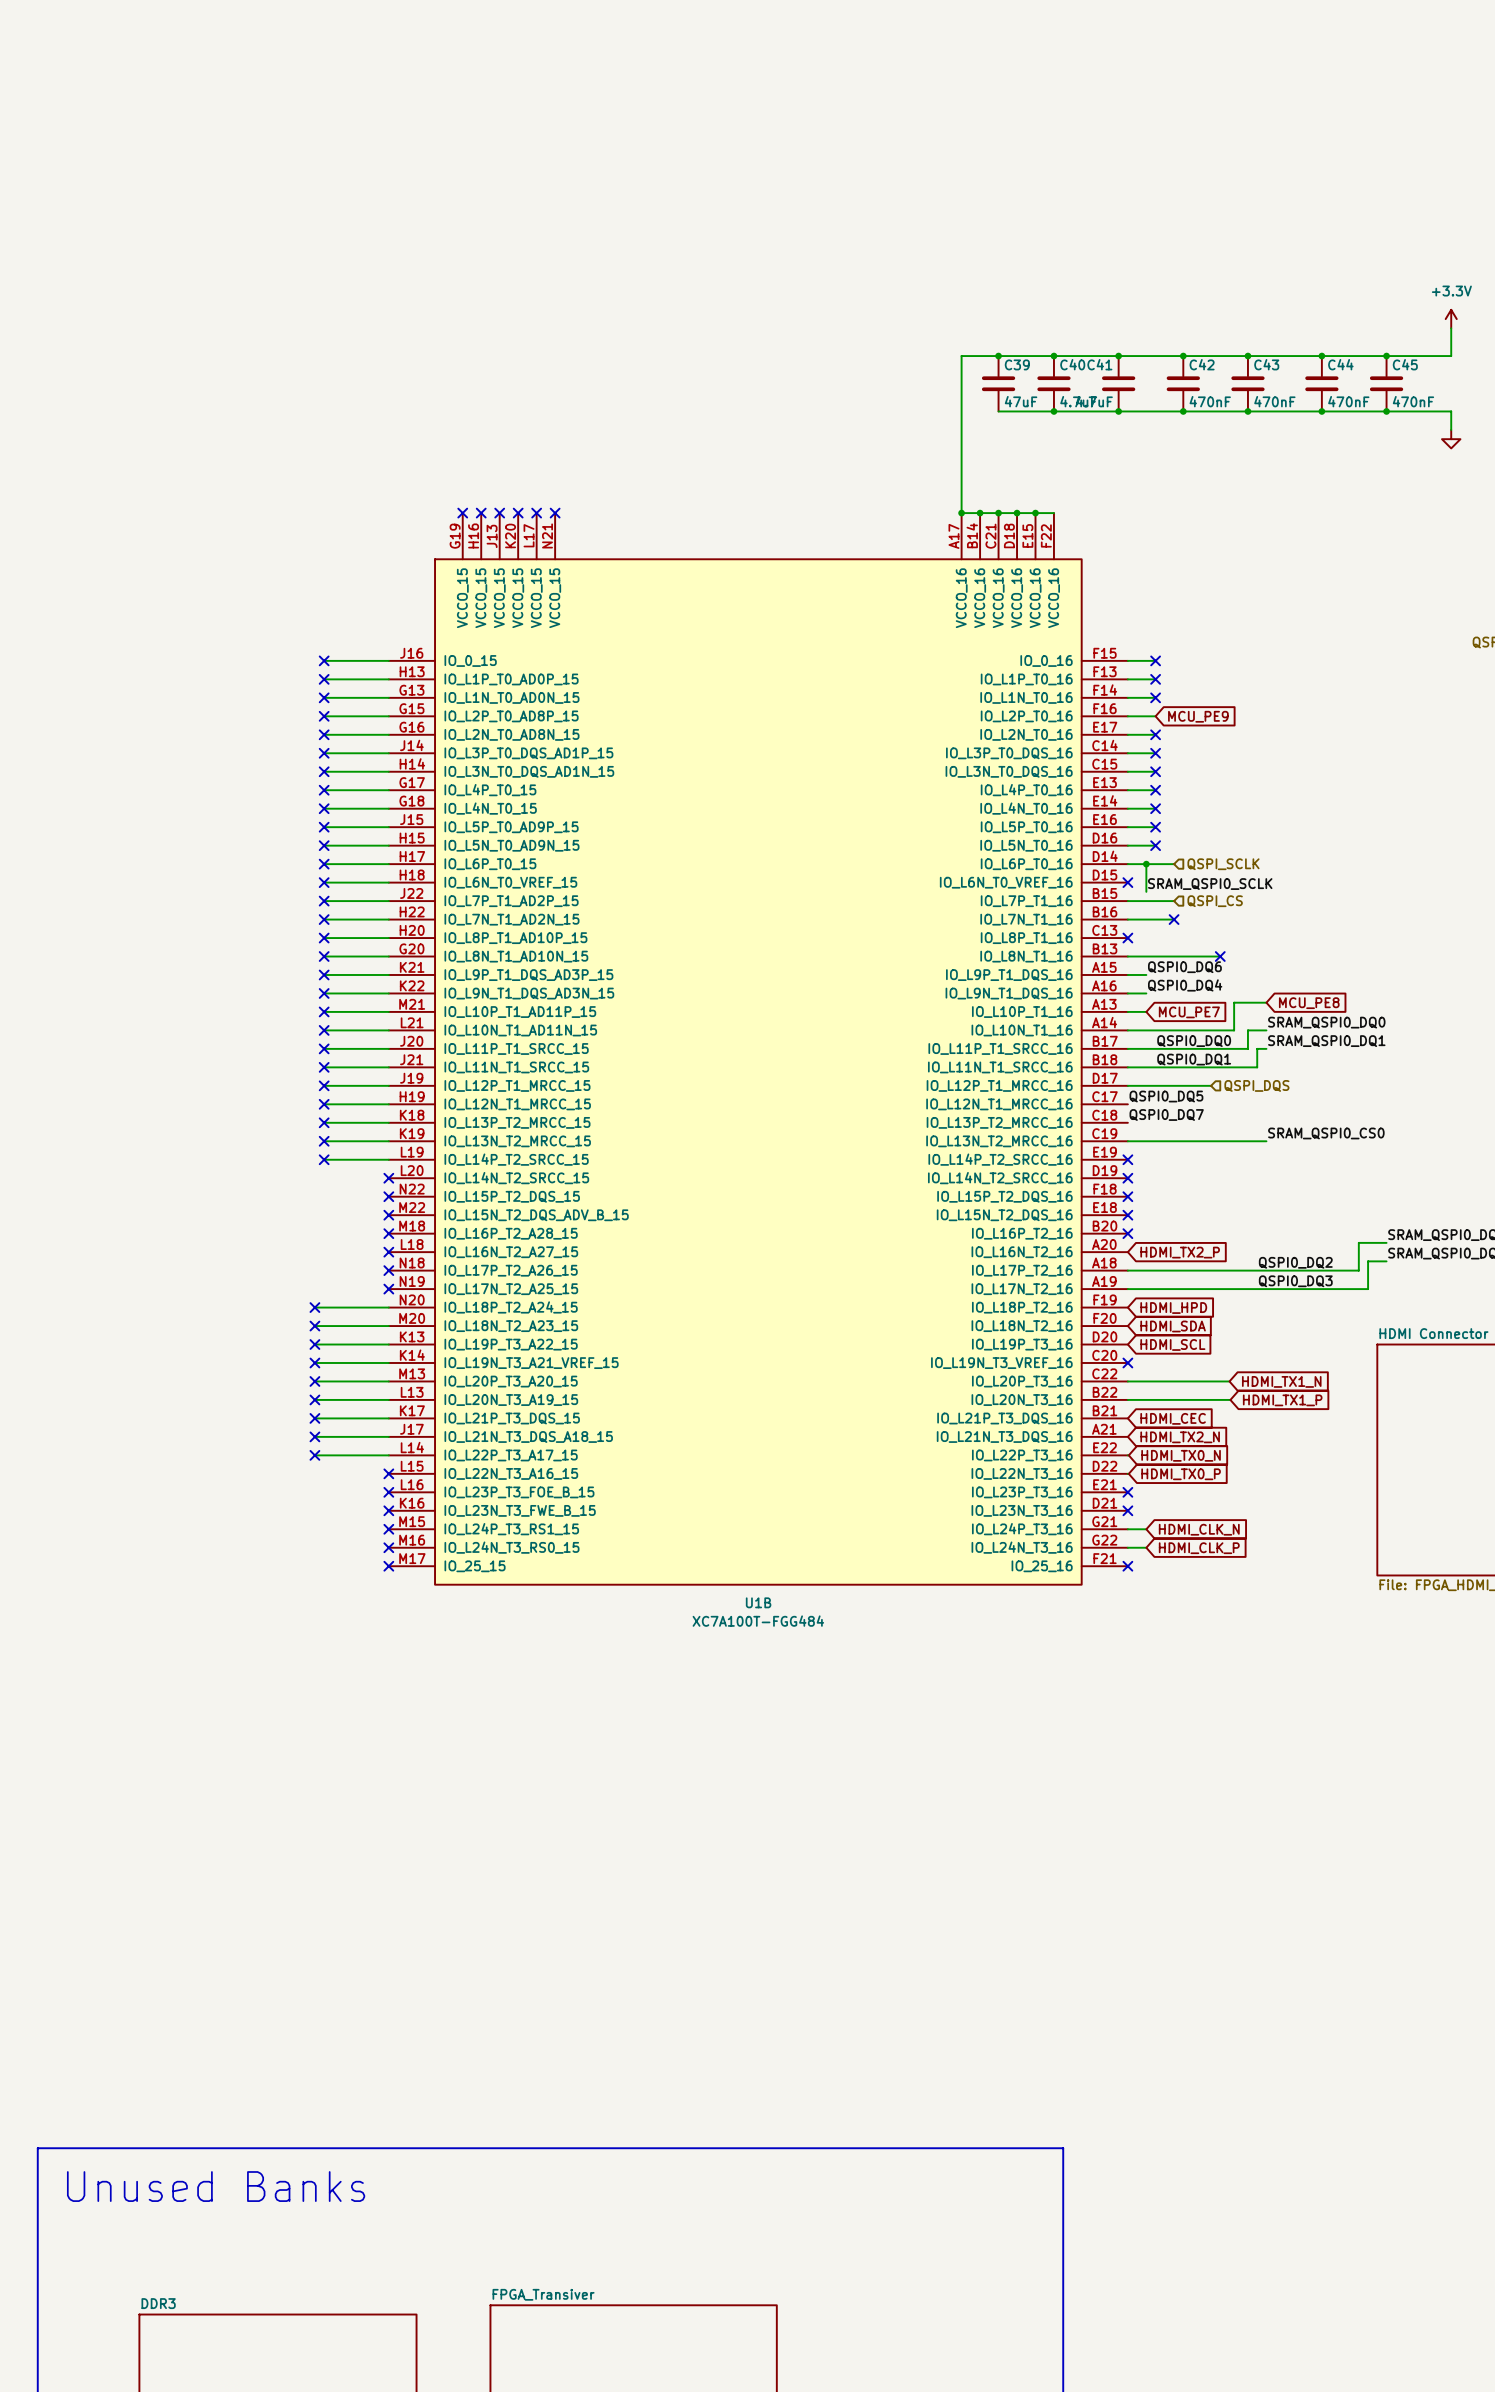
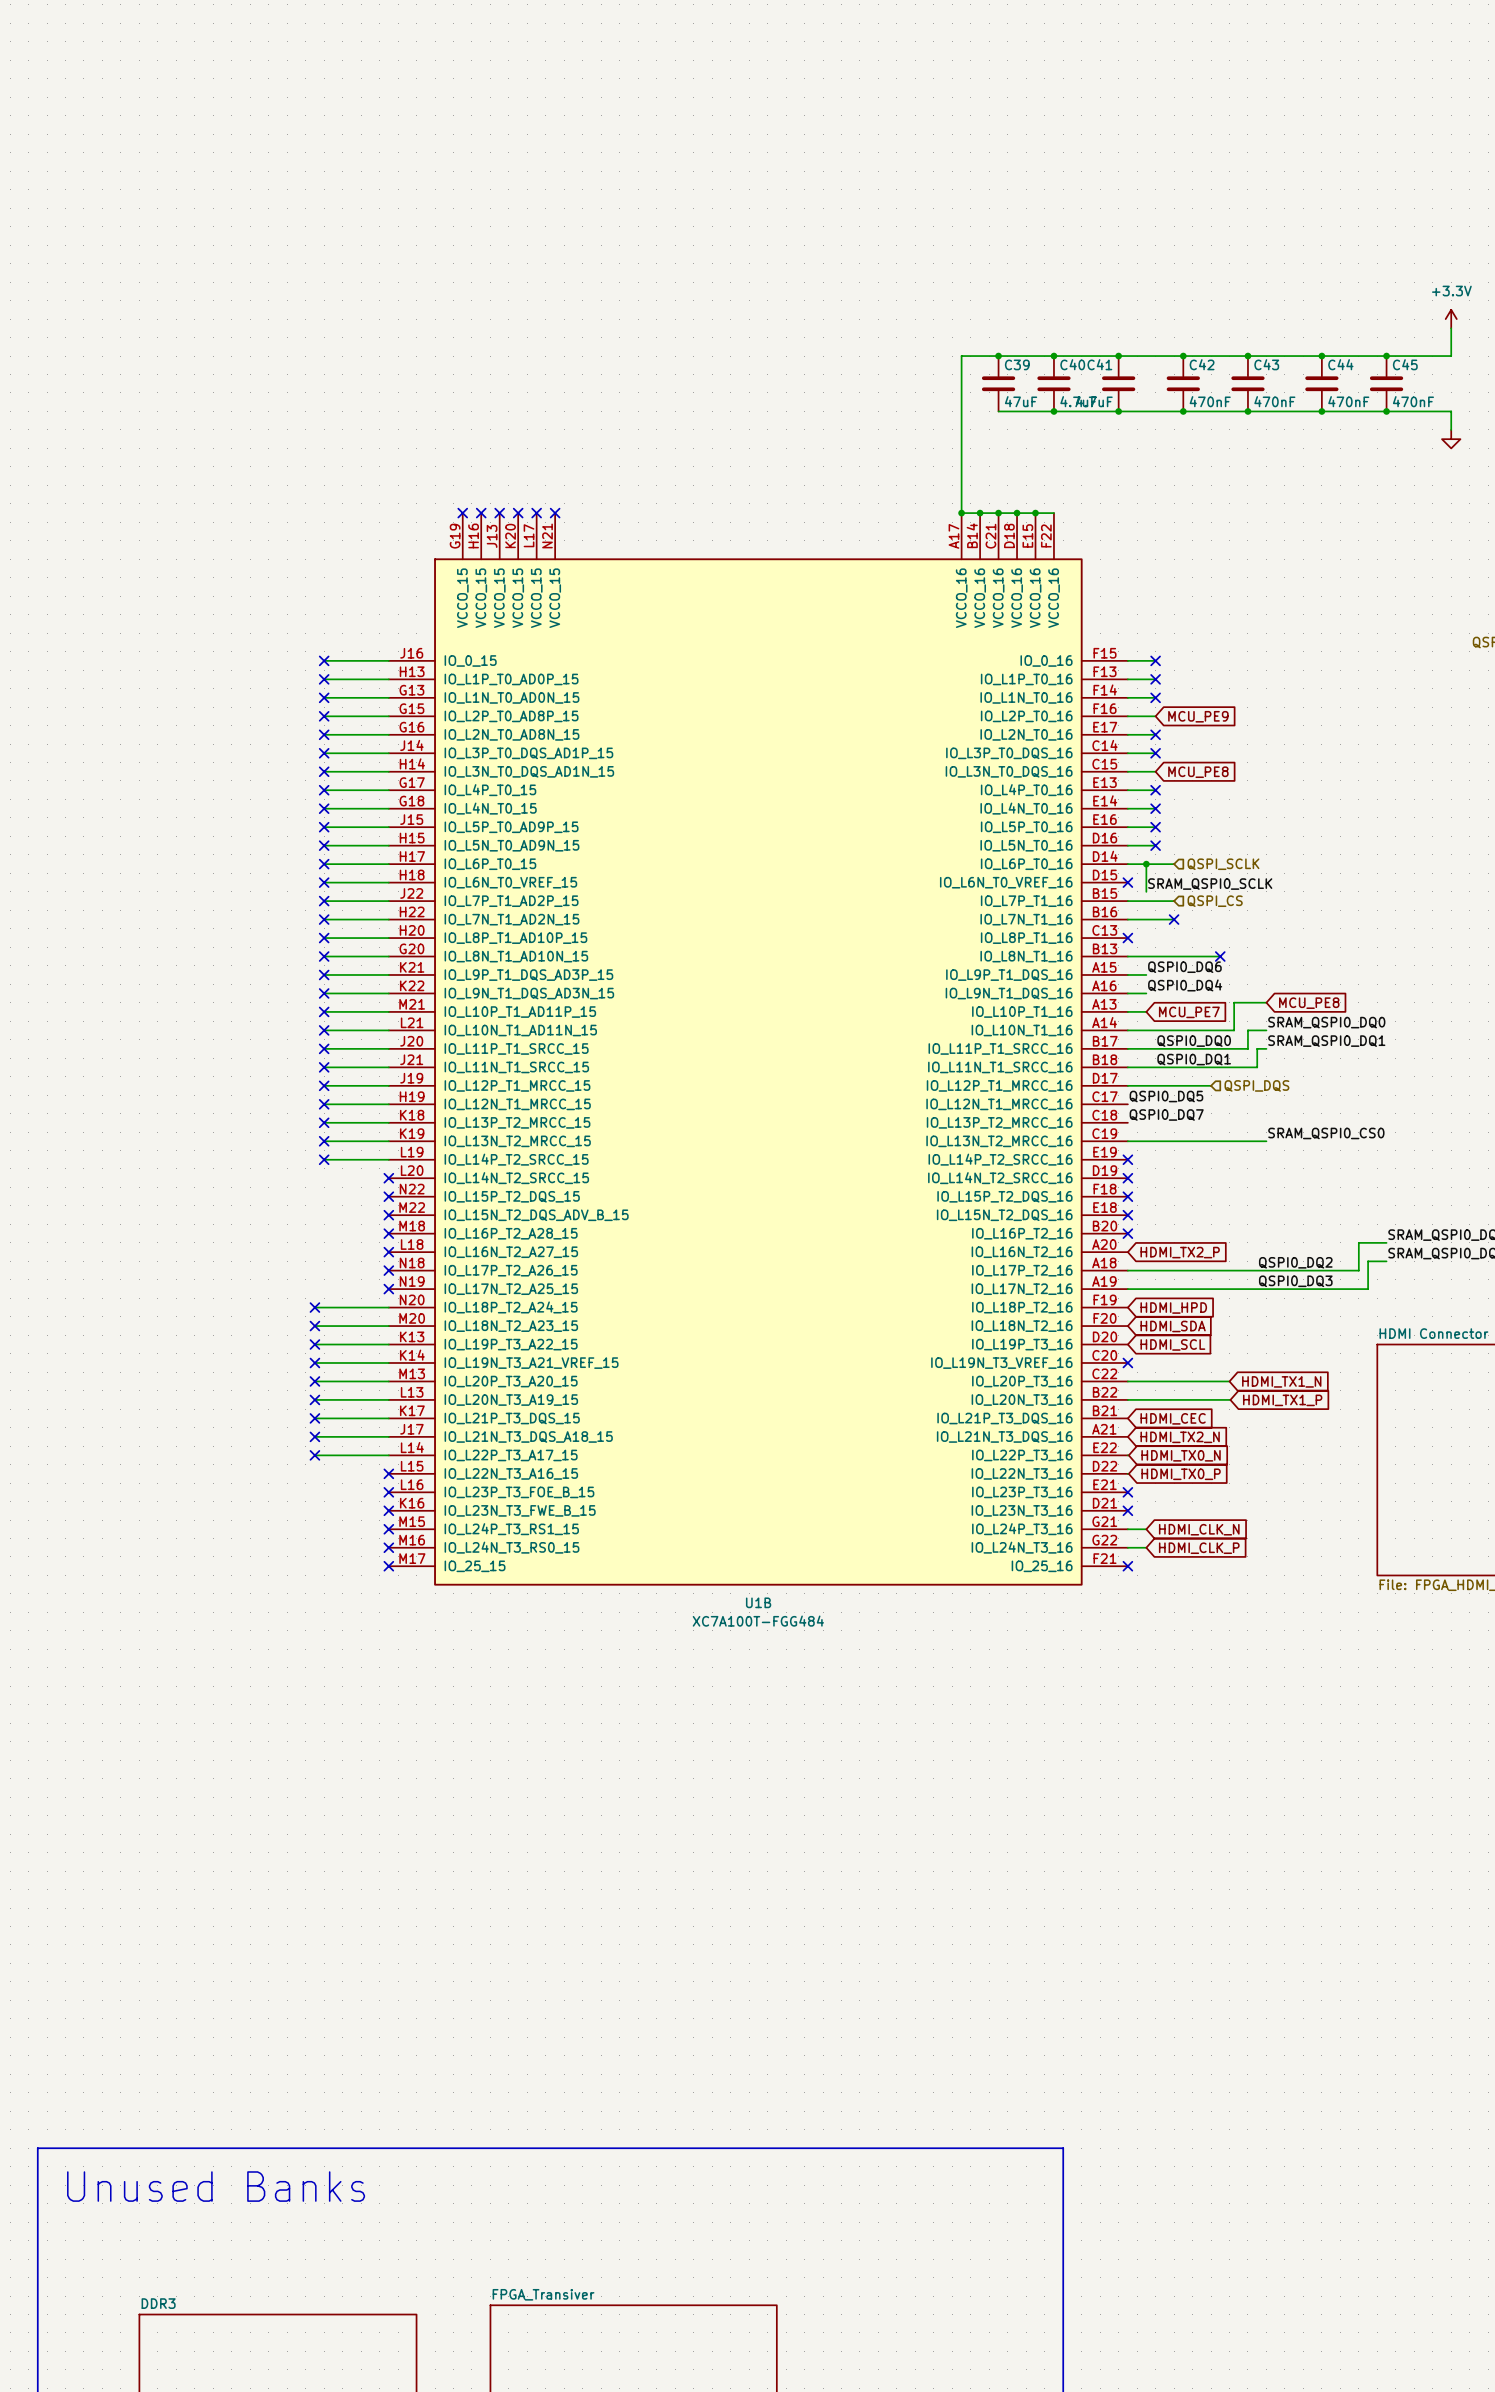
no-connect mark: (1155, 771) -> none
global label: none -> MCU_PE8 (1198, 772)

